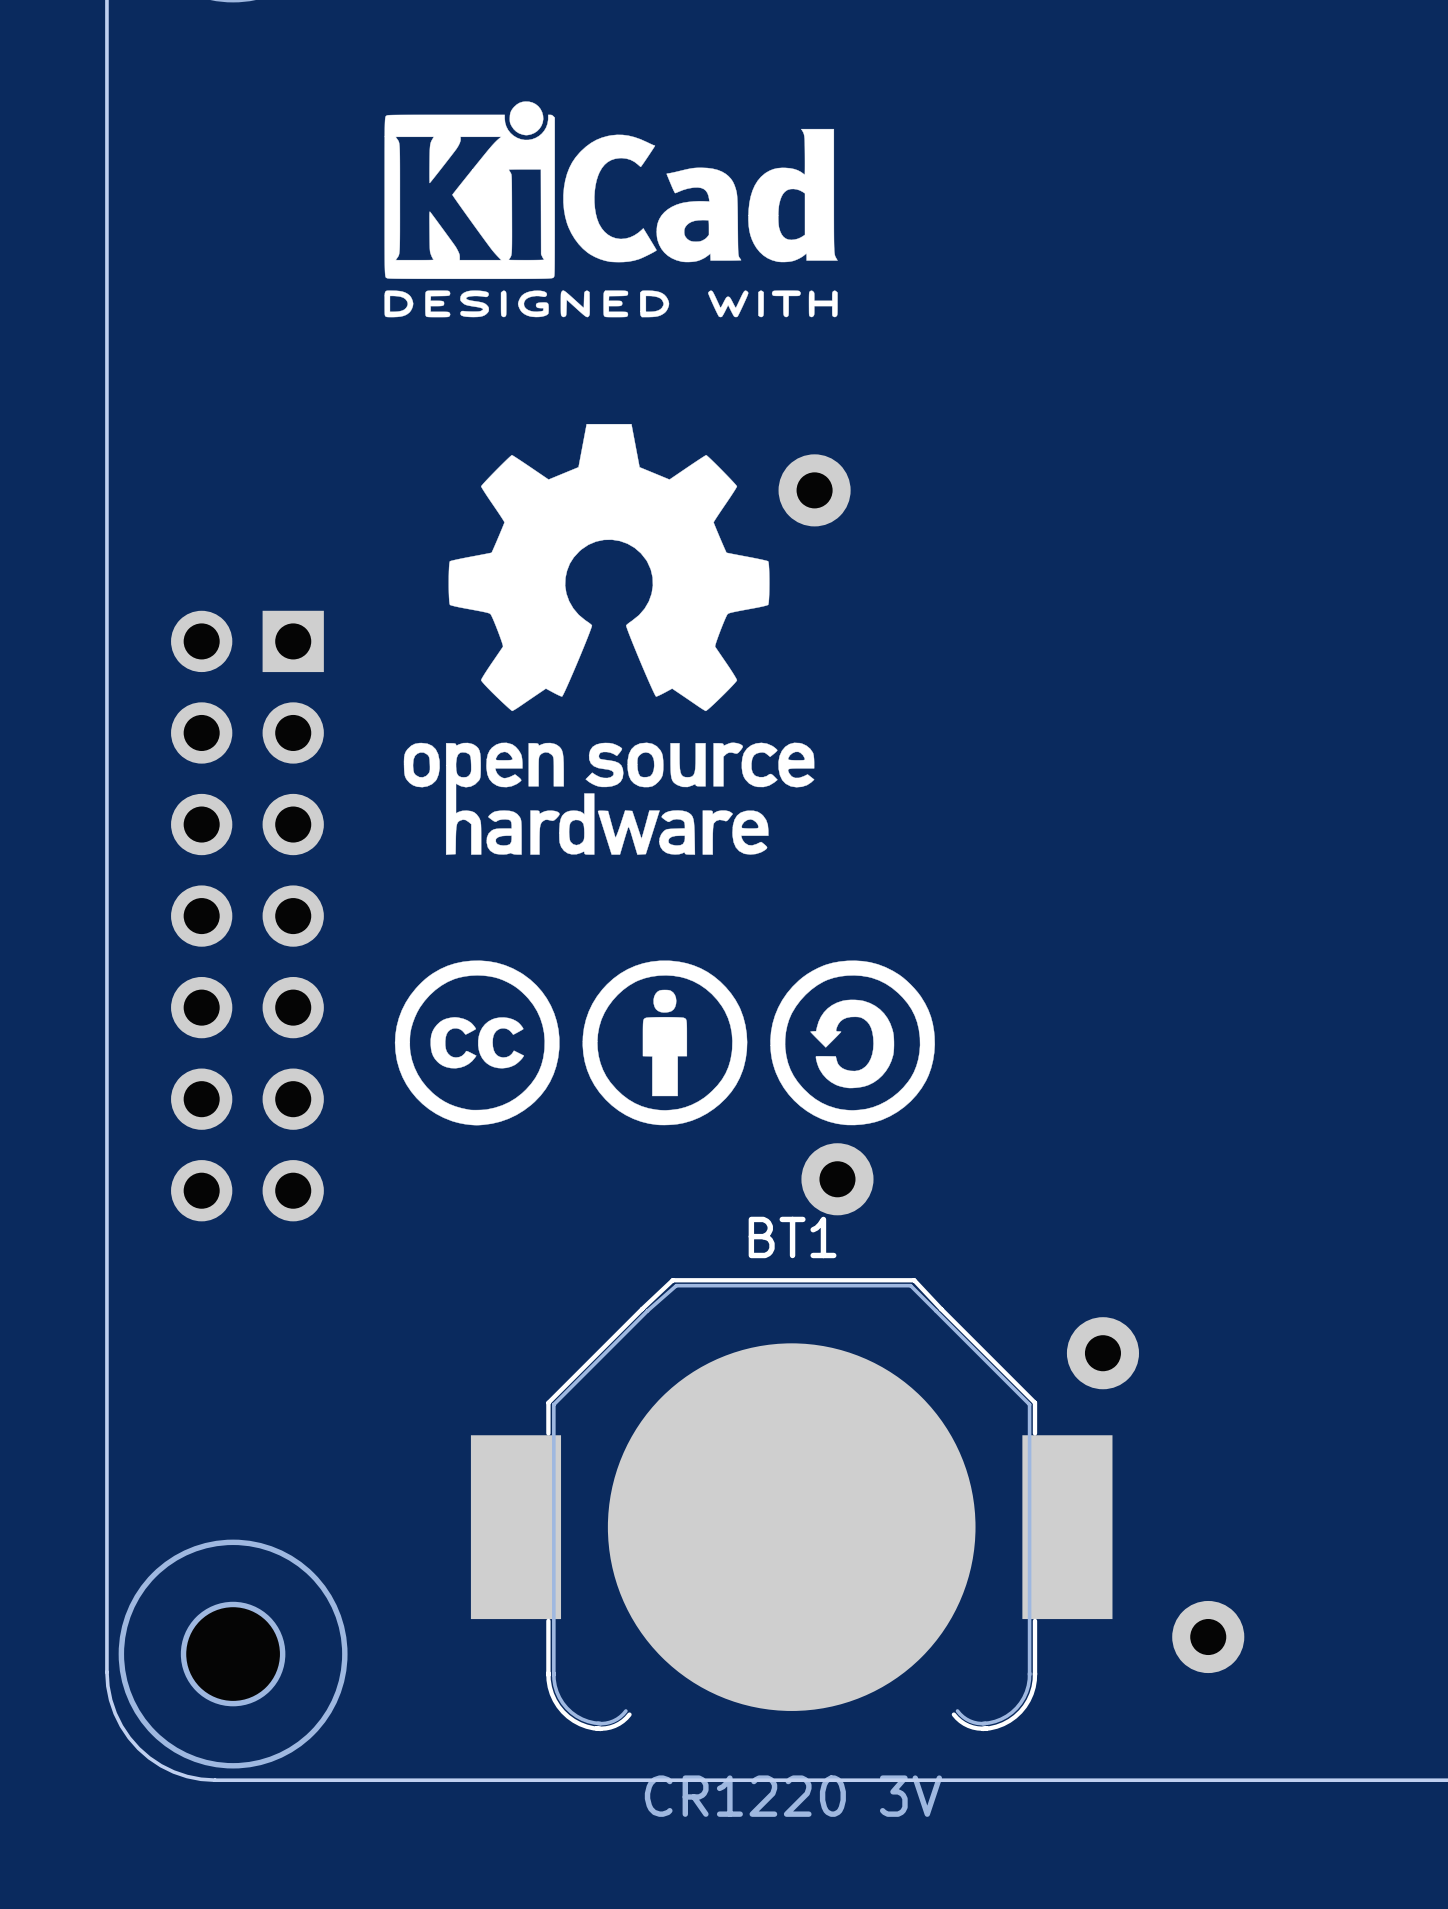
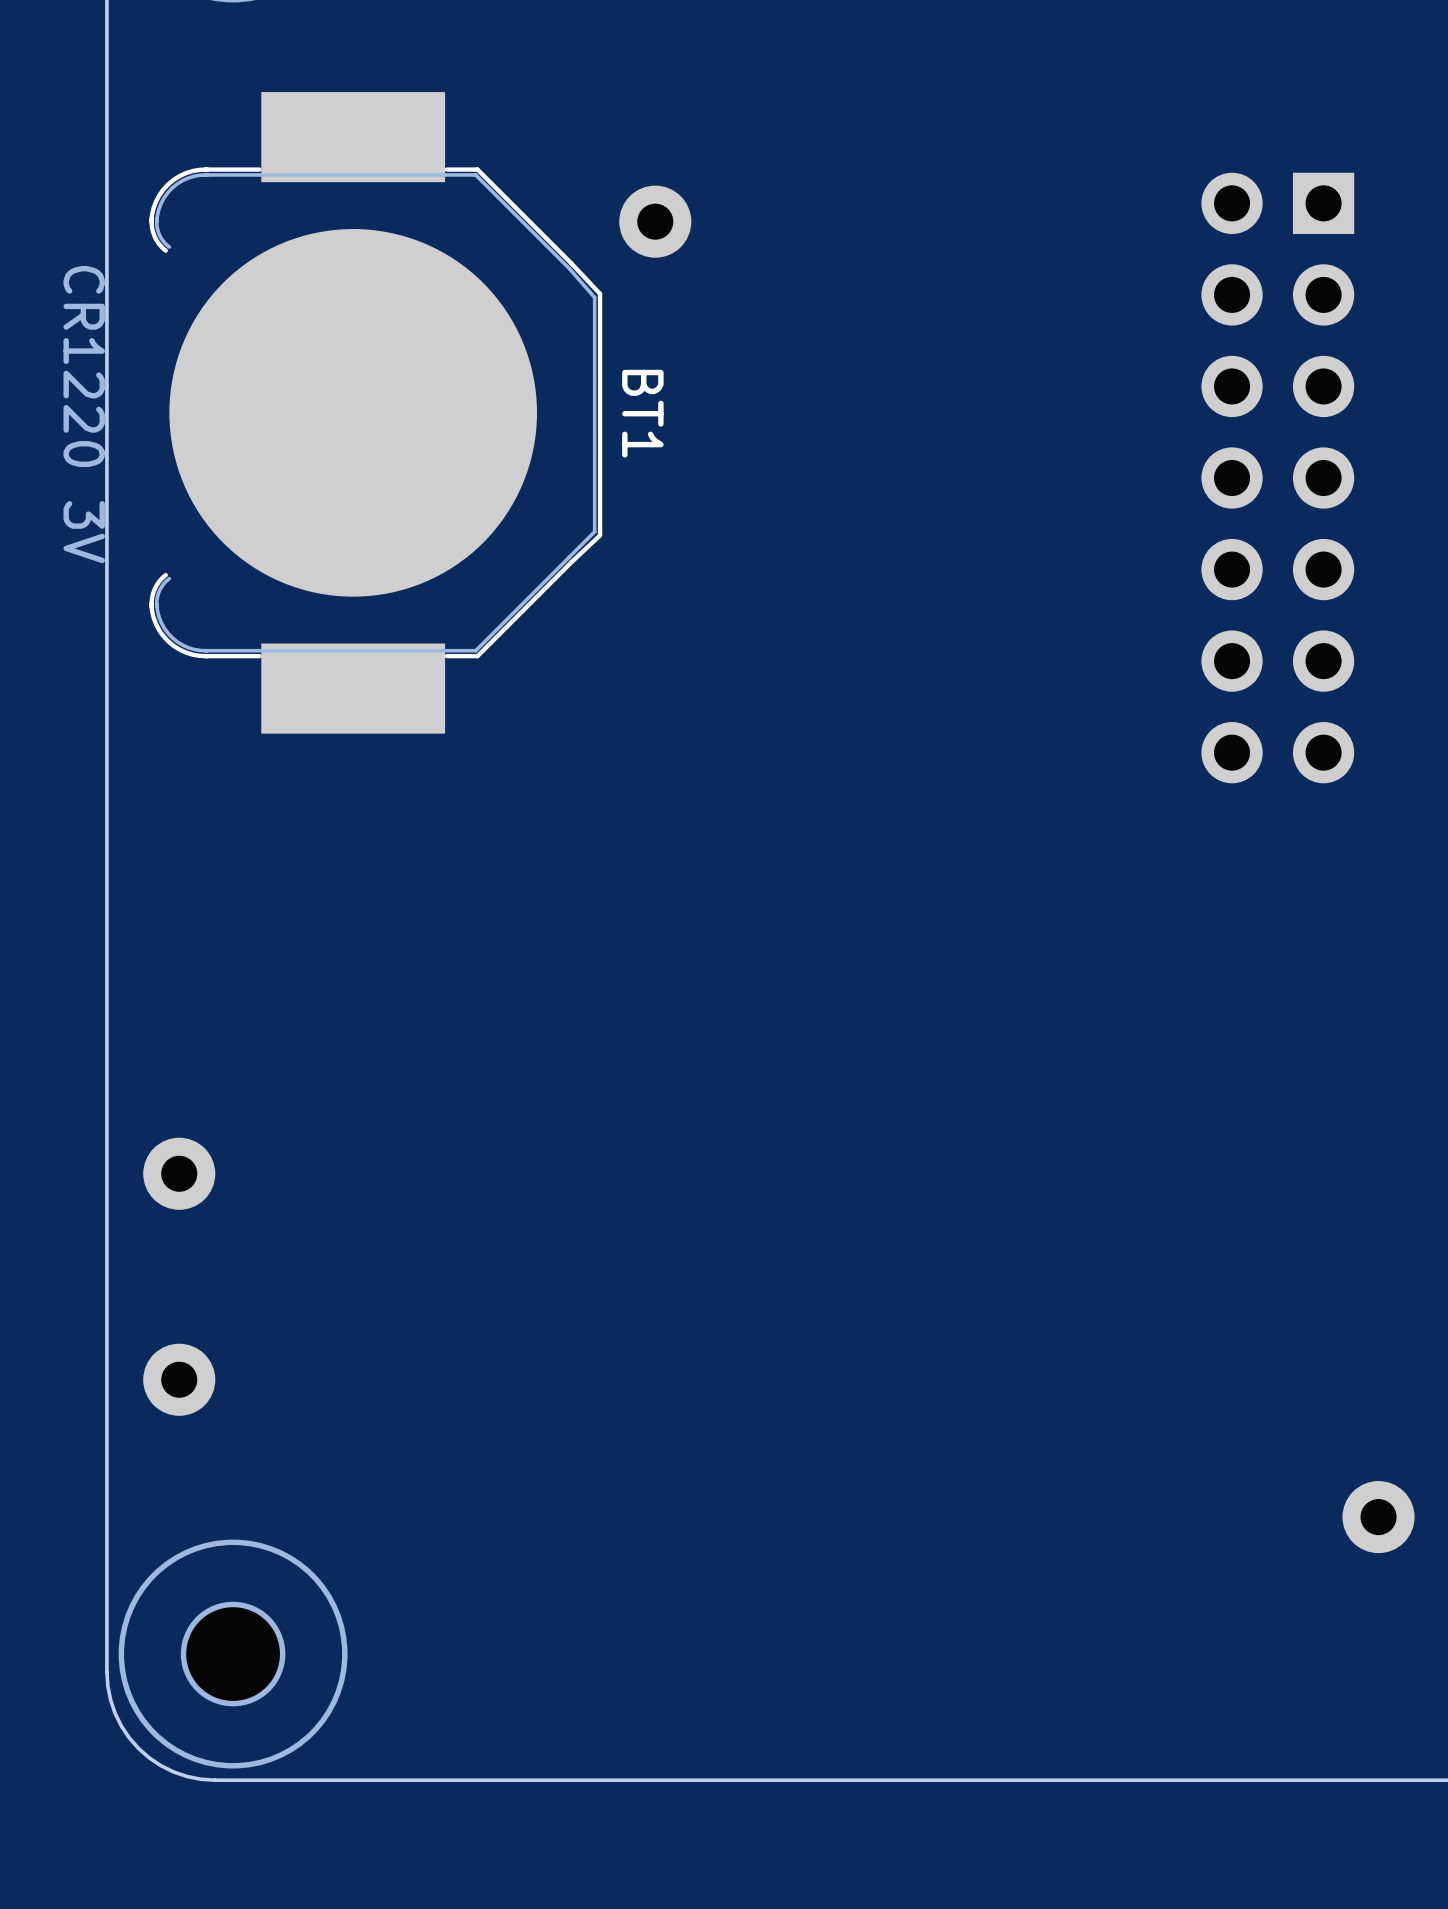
drawing: [384, 101, 838, 318] -> none
drawing: [403, 424, 815, 855] -> none
part: none -> (1277, 478)
part position: (814, 490) -> (655, 221)
part: (247, 916) -> none
drawing: [394, 960, 935, 1126] -> none
part: none -> (179, 1173)
part: (837, 1179) -> none
part: (1102, 1353) -> none
part: none -> (179, 1379)
BT1 rotation: 0° (791, 1504) -> 90° clockwise (375, 412)
BT1 position: (791, 1504) -> (375, 412)
part: none -> (1378, 1517)
part: (1208, 1637) -> none

